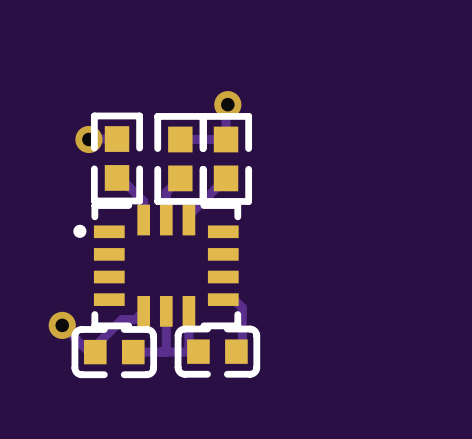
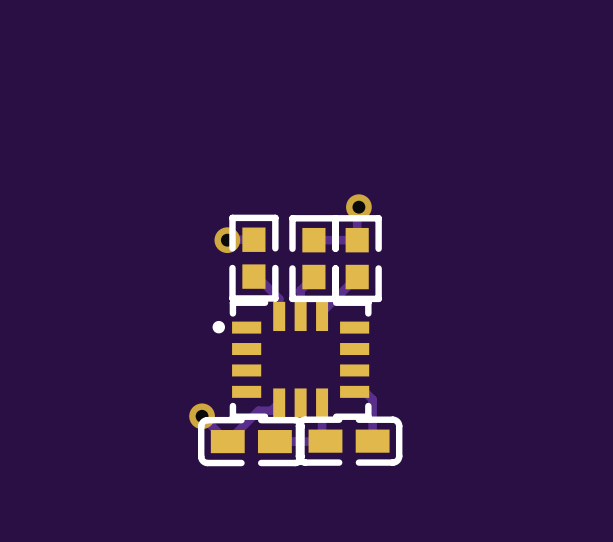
part footprint: [174, 325, 261, 378] -> [295, 416, 403, 466]
part footprint: [71, 326, 158, 379] -> [197, 416, 305, 467]

